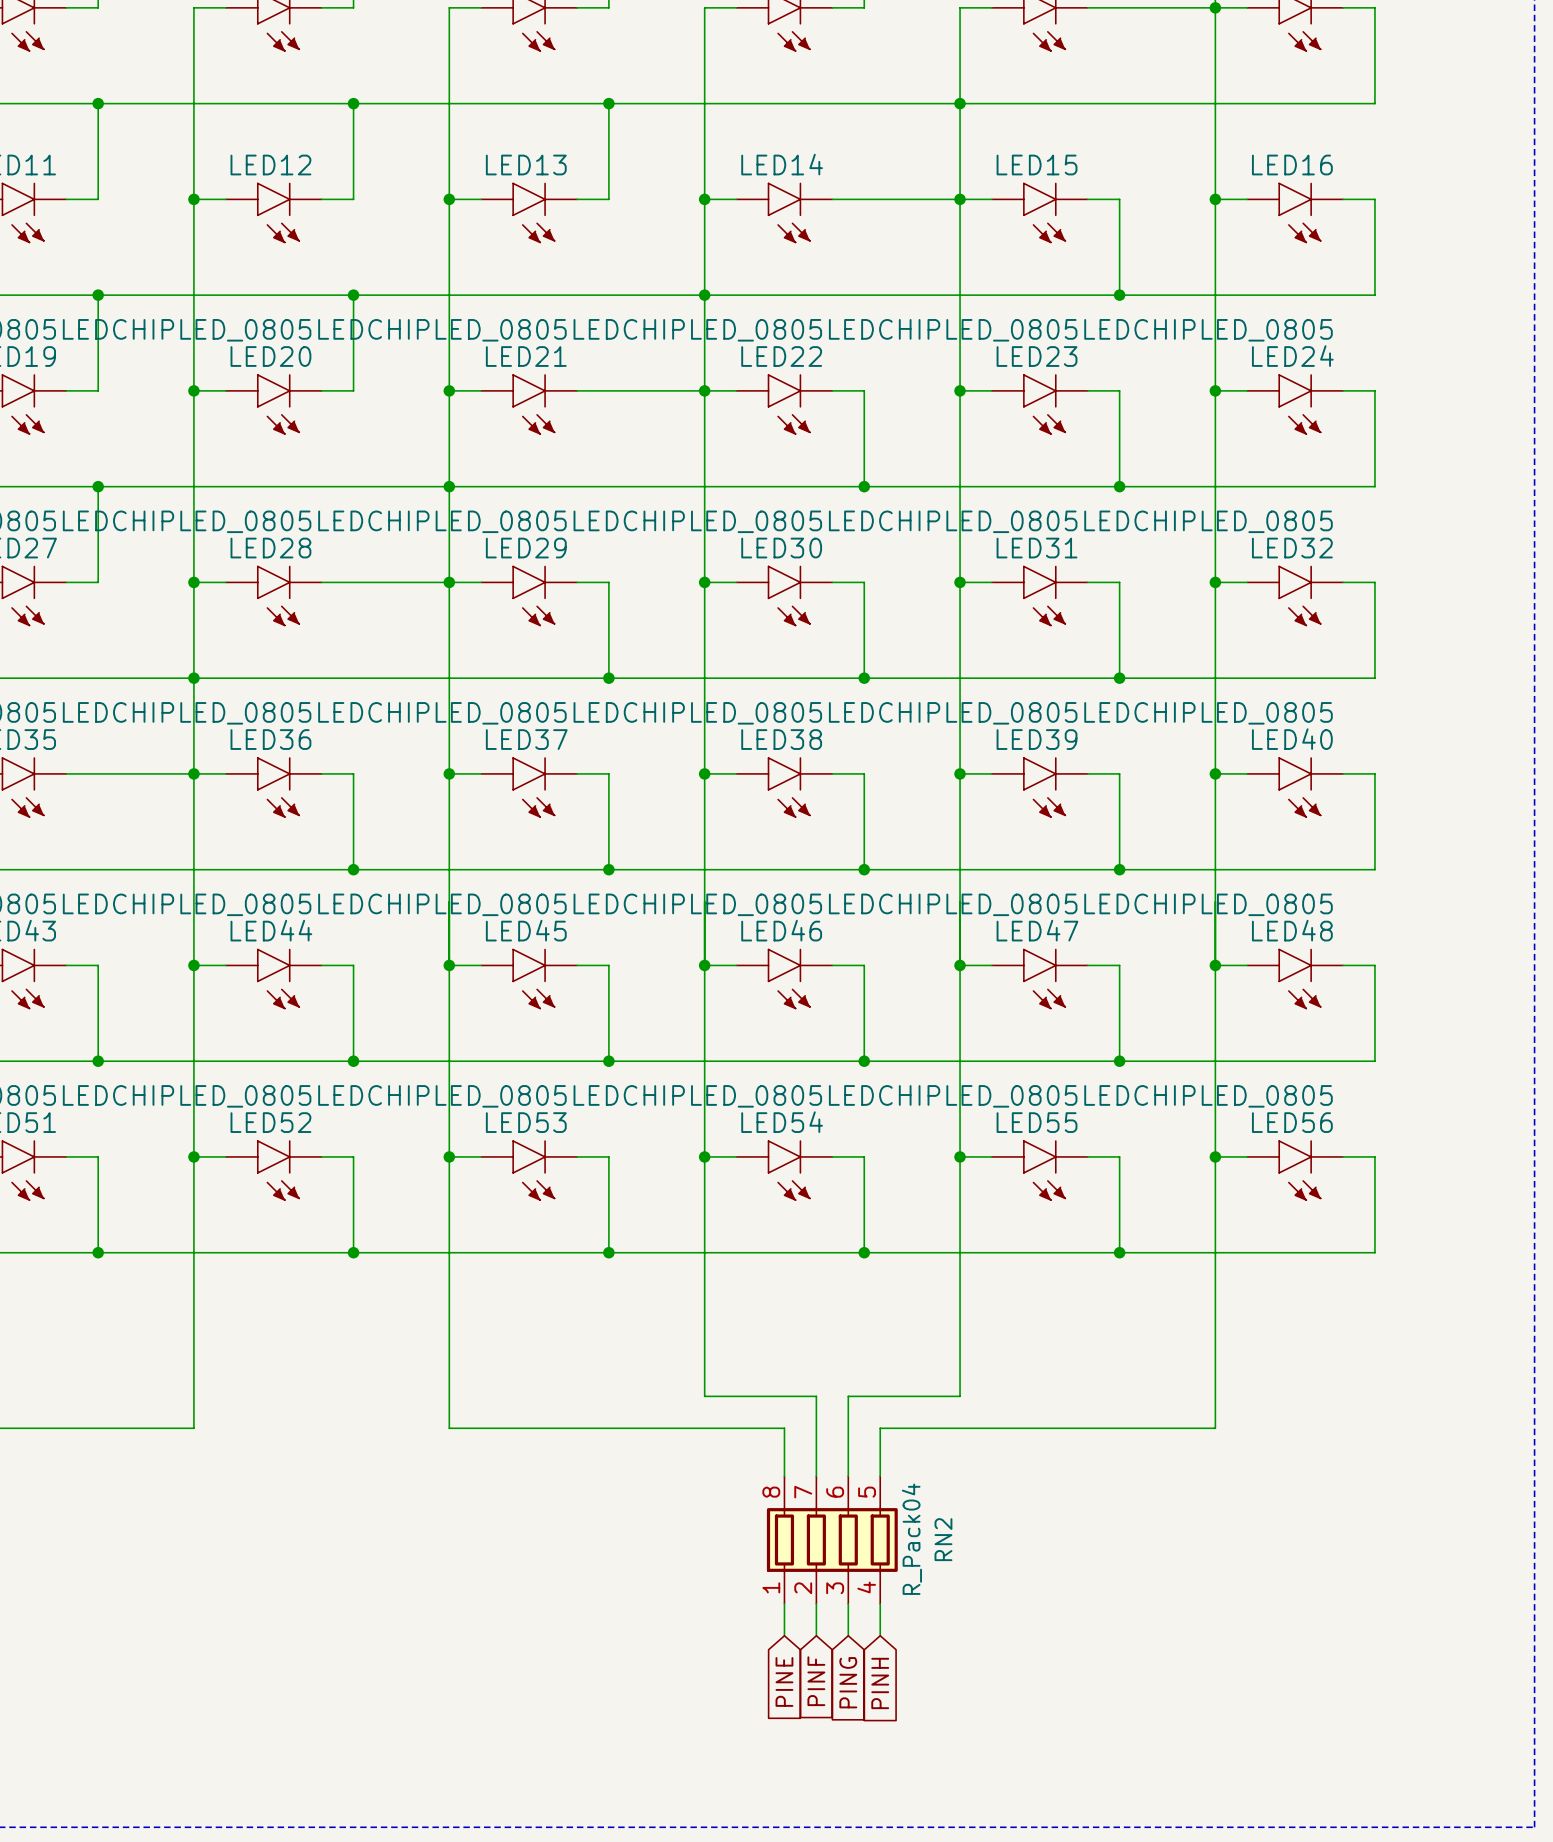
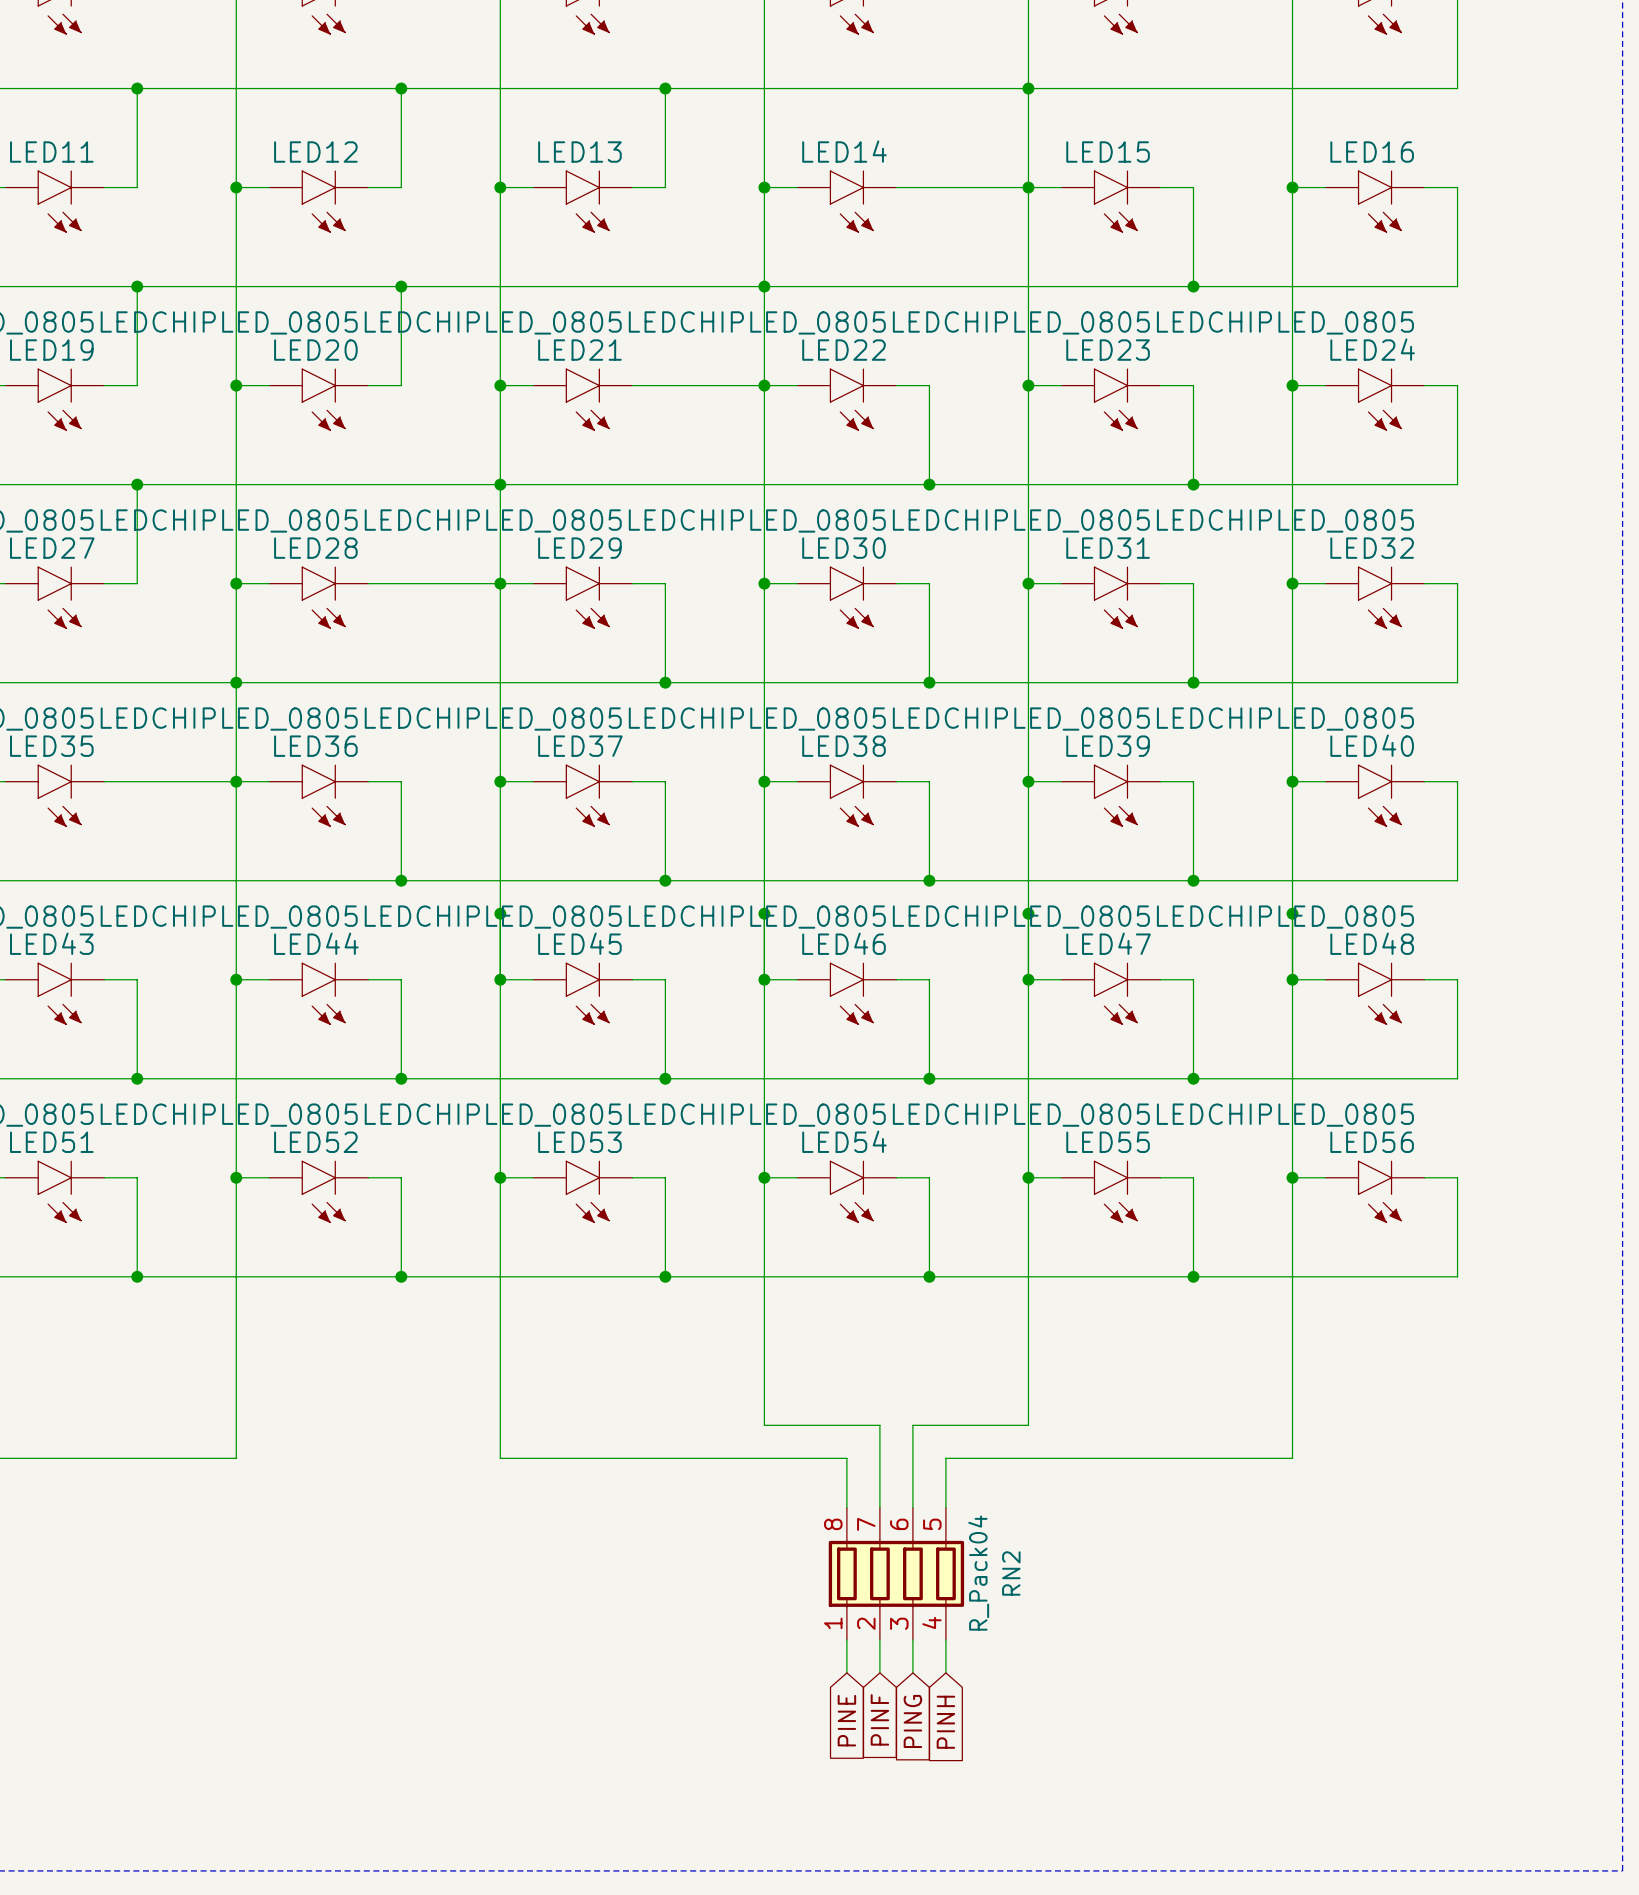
junction: none -> (500, 913)
junction: none -> (764, 913)
junction: none -> (1028, 913)
junction: none -> (1292, 913)

